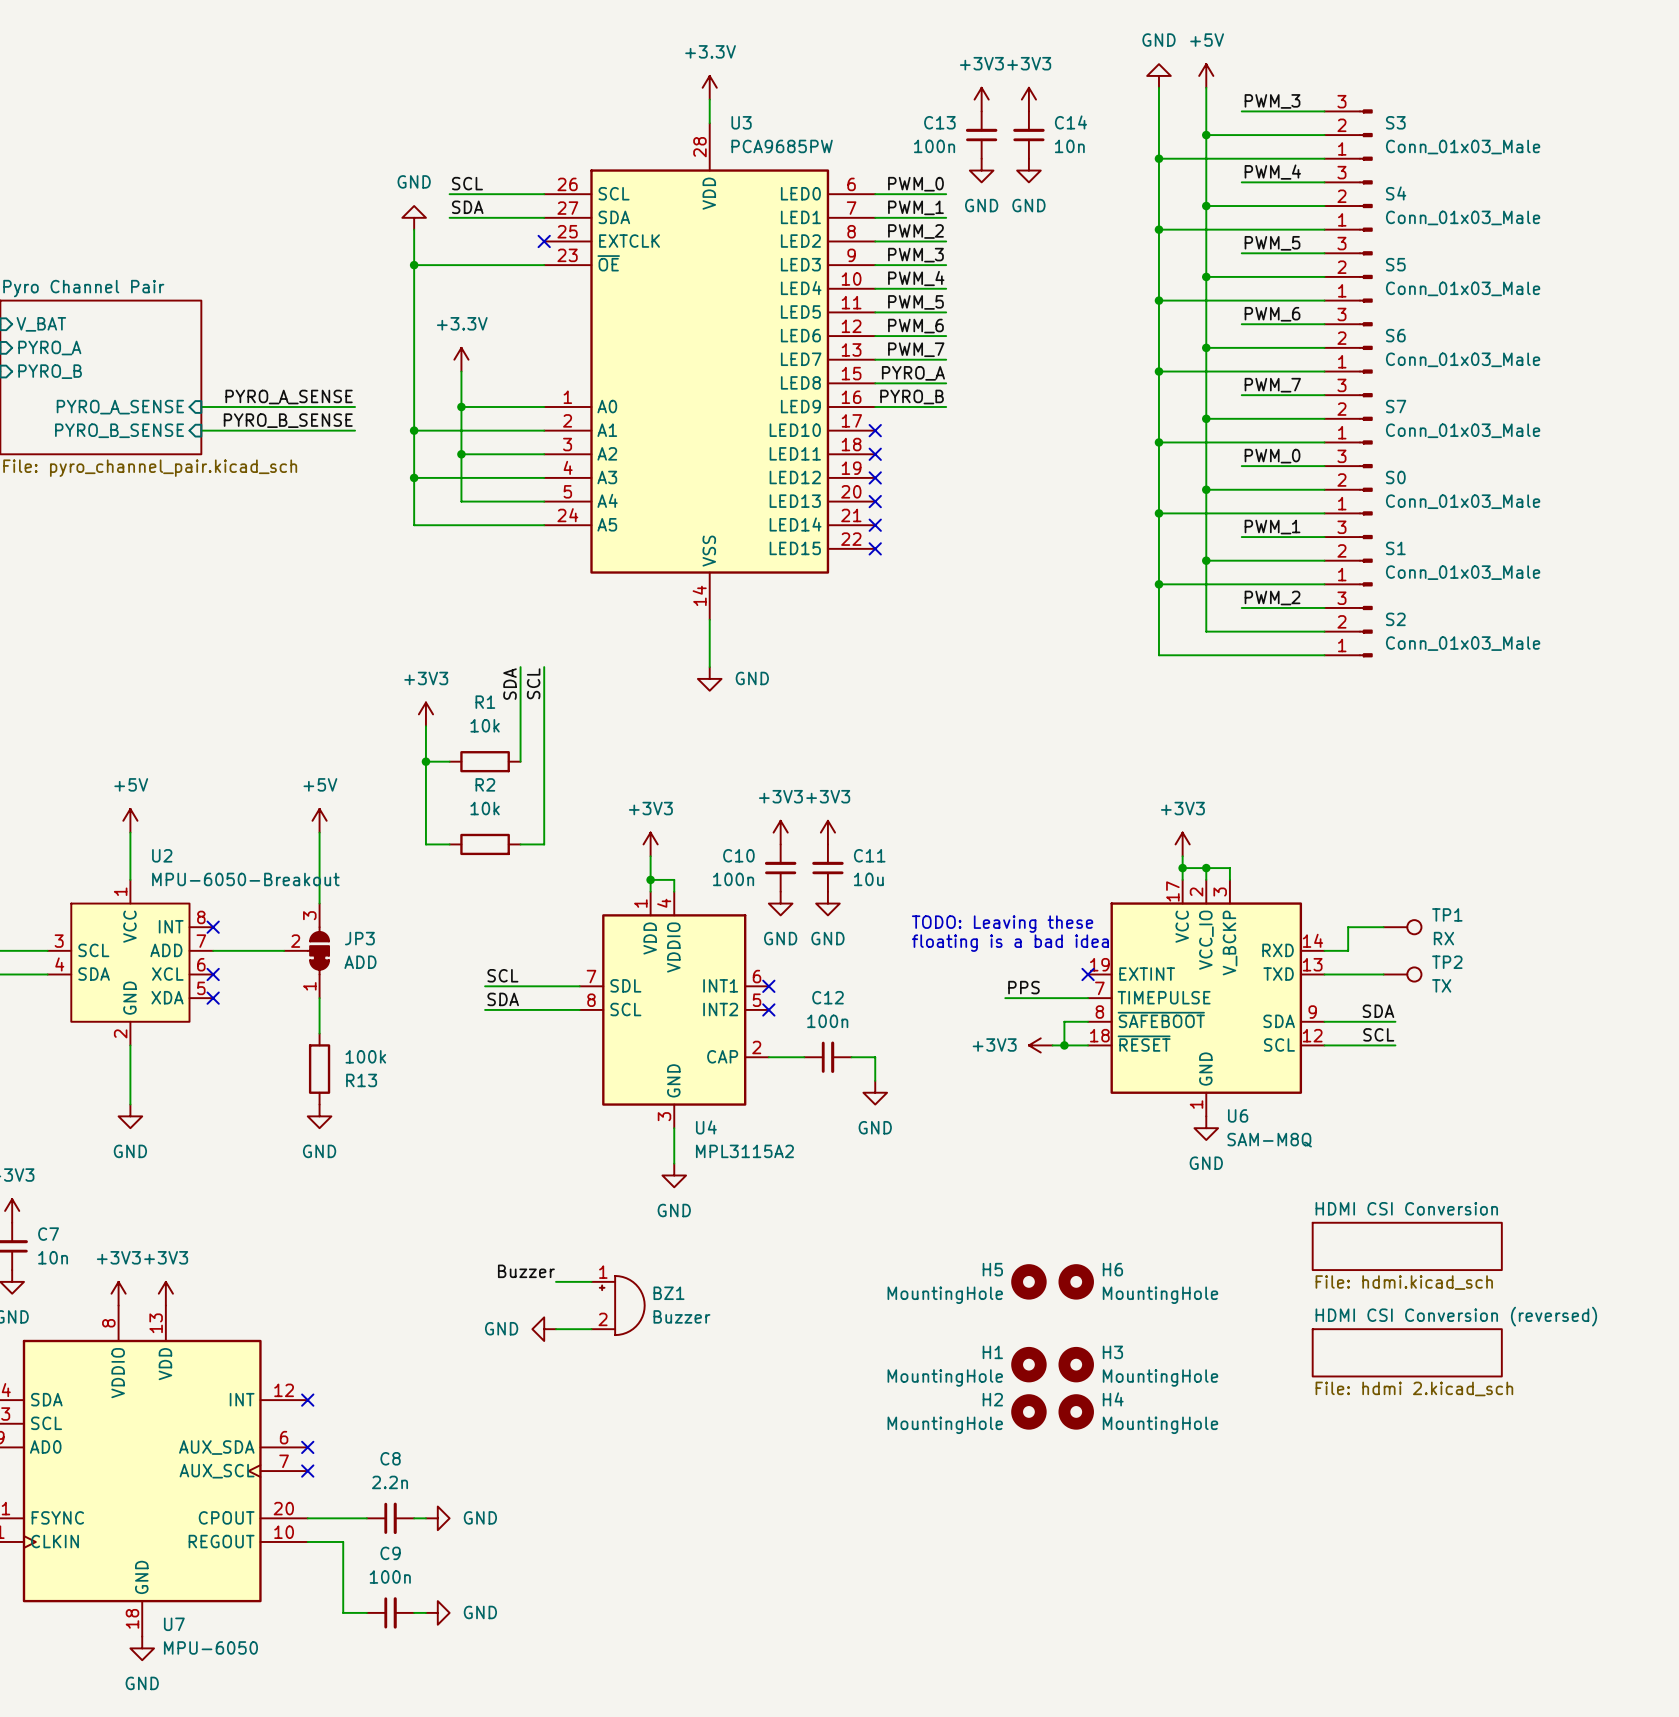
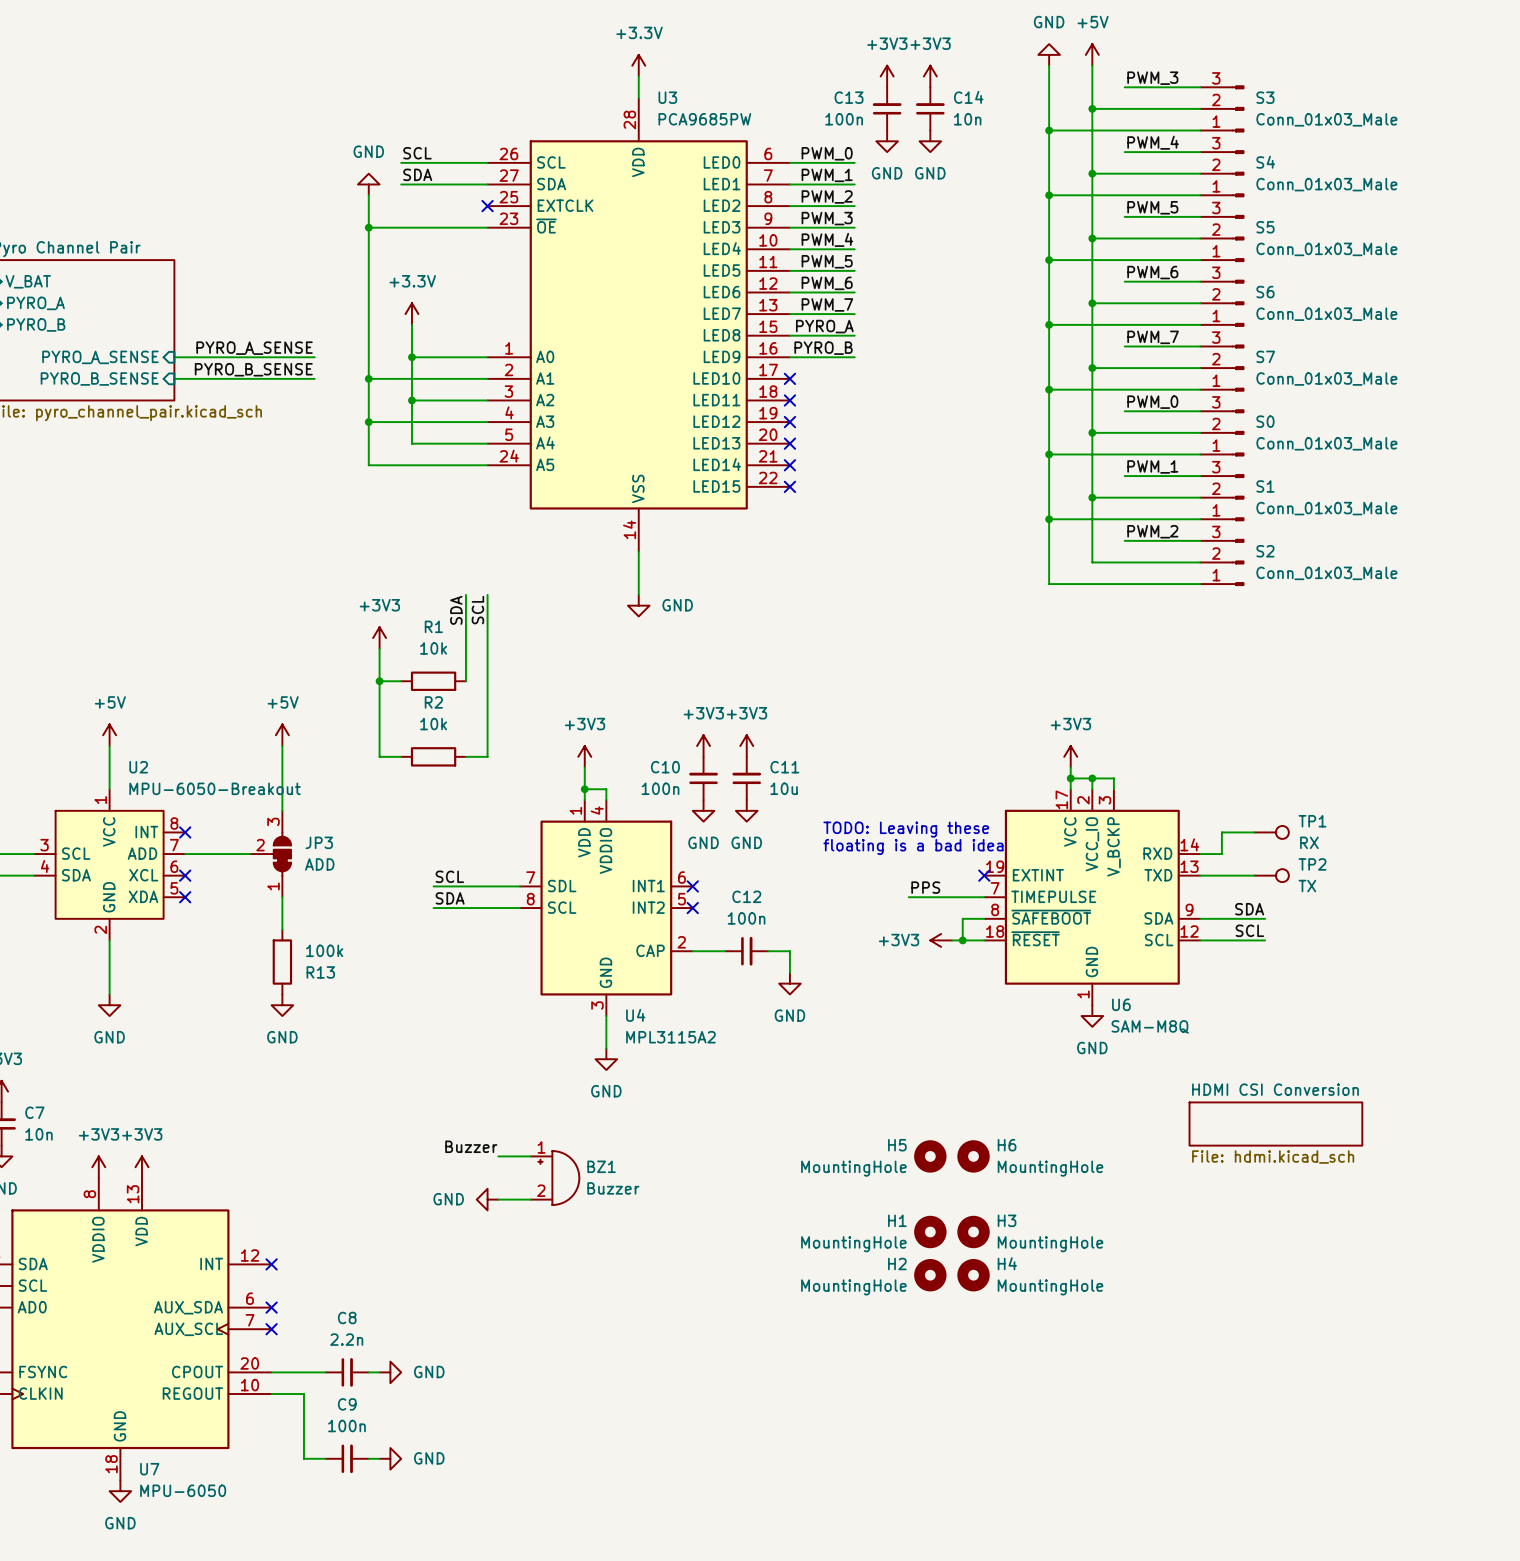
sheet HDMI CSI Conversion (reversed): File: hdmi 2.kicad_sch (1407, 1352) -> none

